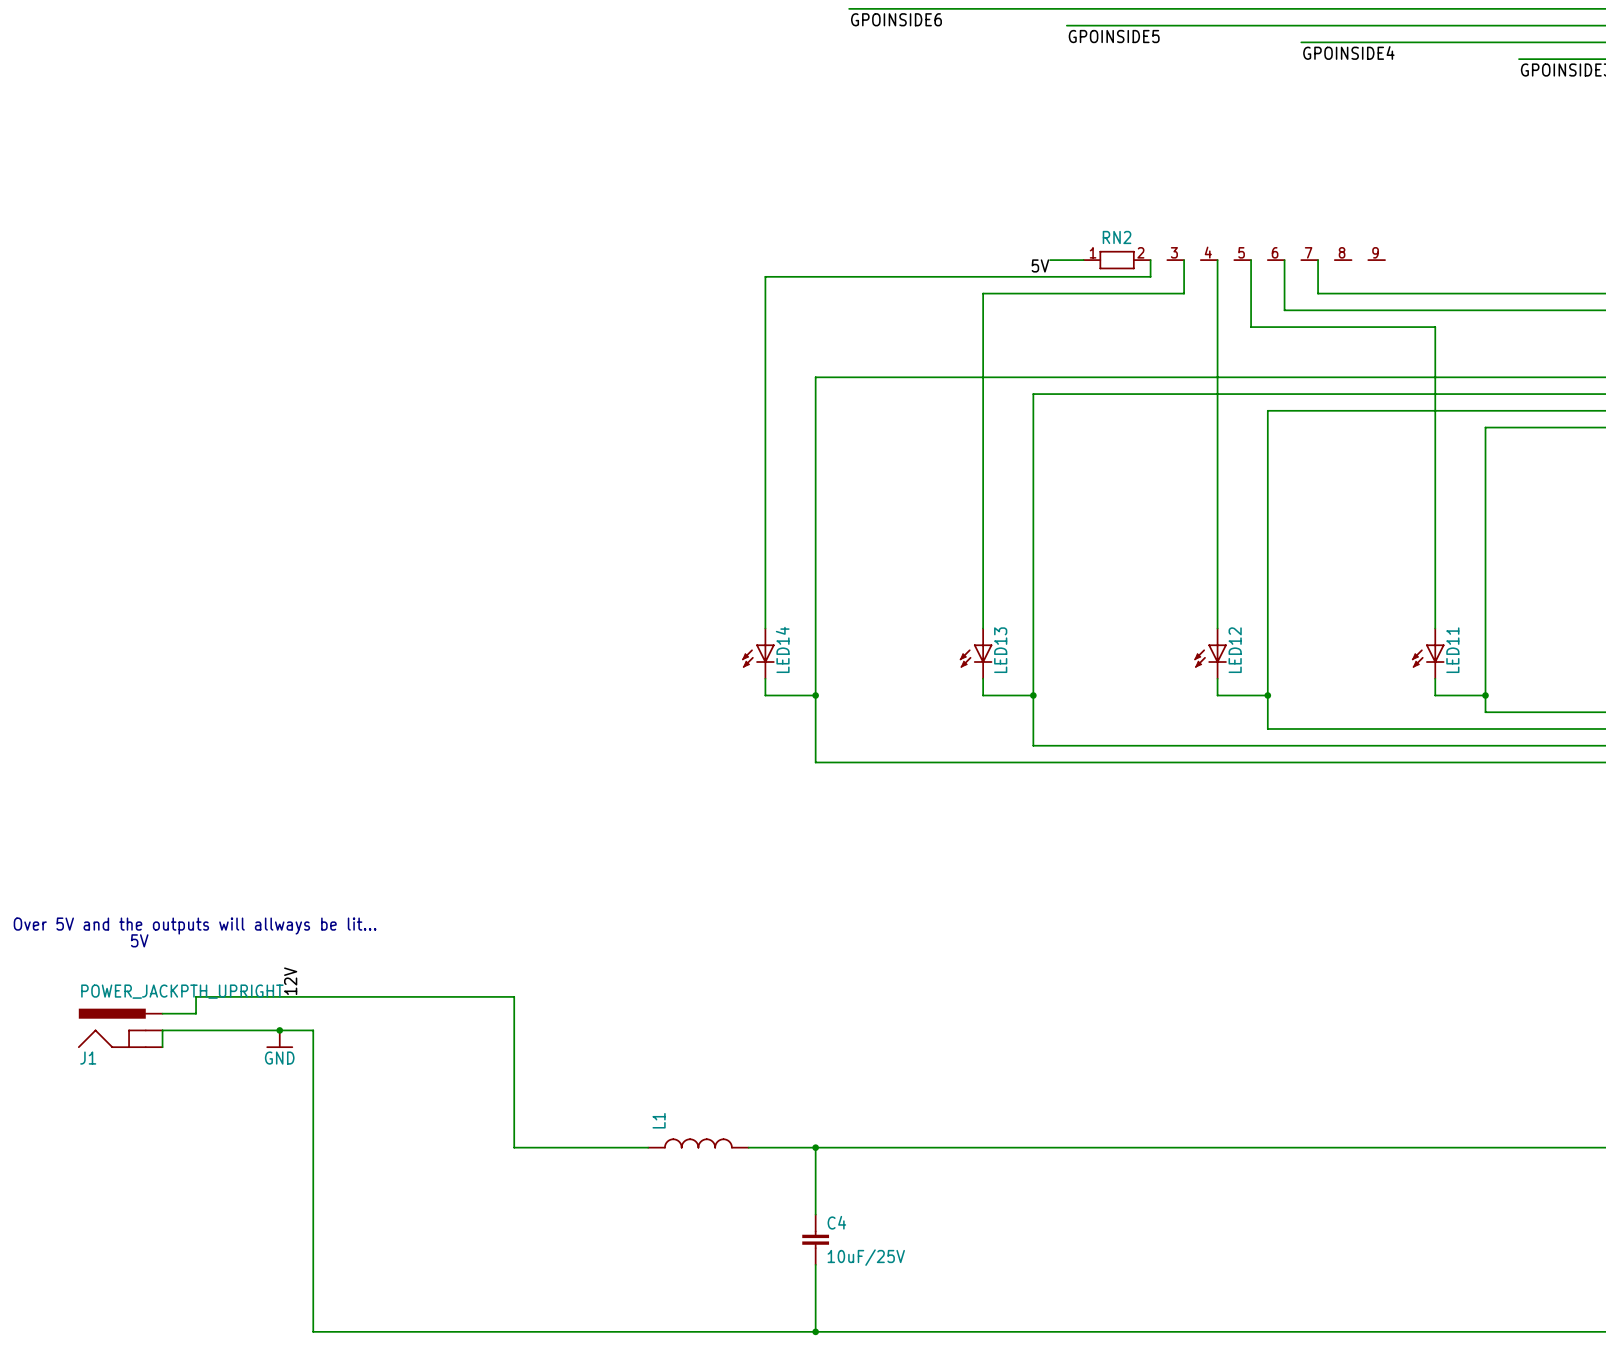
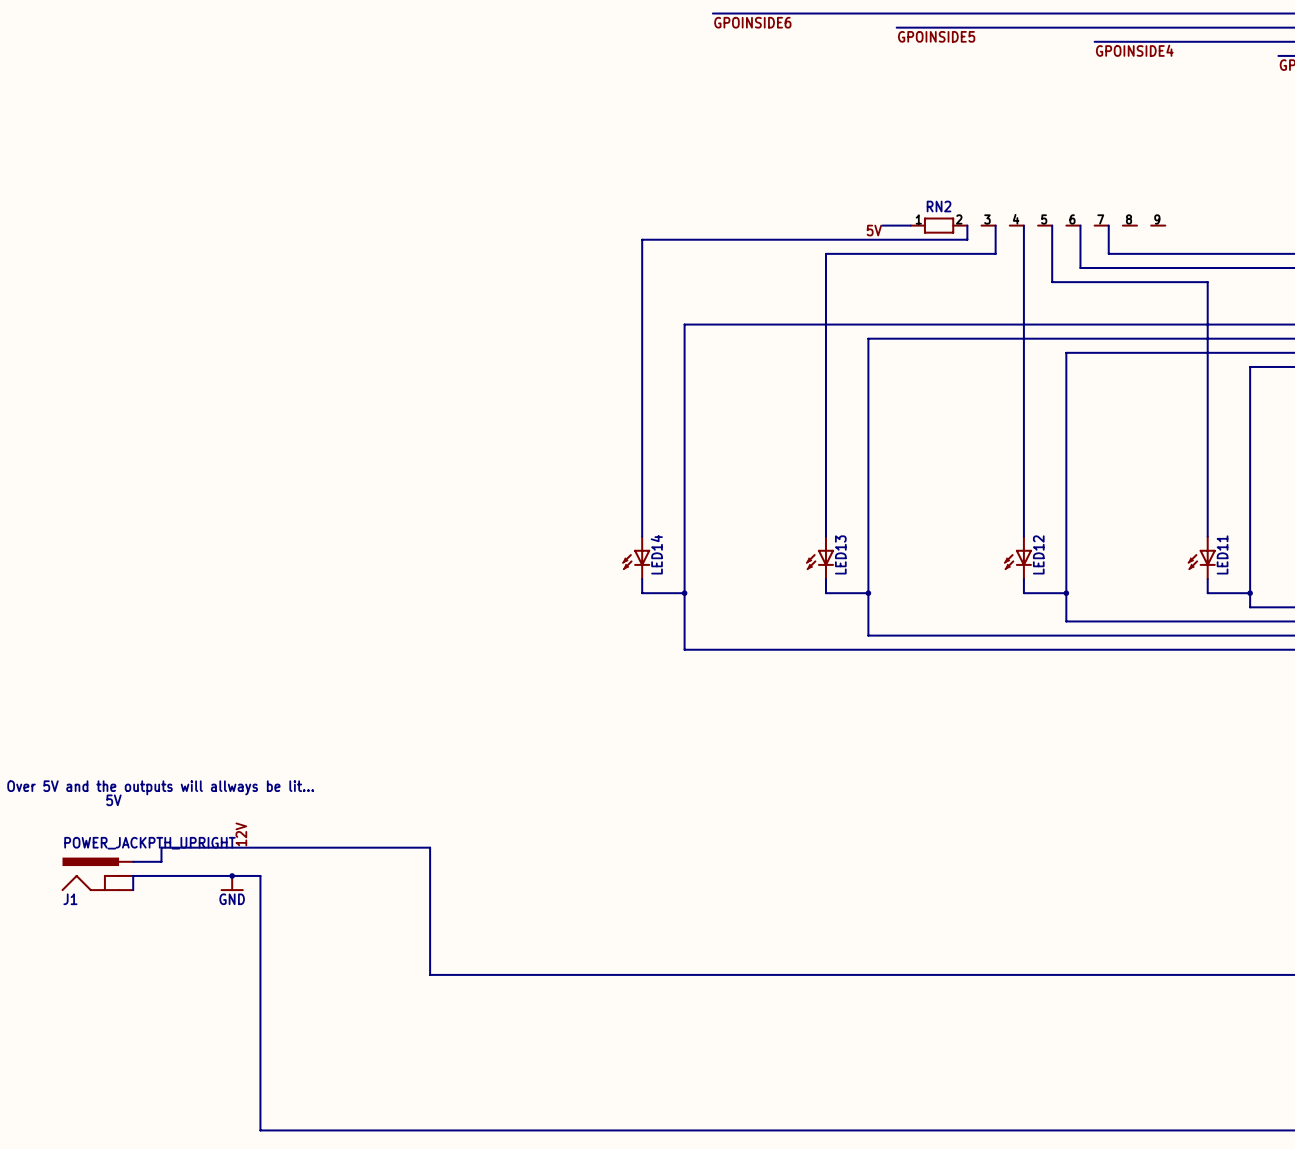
L1: (698, 1143) -> none
wire: none -> (543, 974) (628, 974)
wire: (815, 1147) (815, 1214) -> none
junction: (815, 1147) -> none
C4: 10uF/25V (815, 1239) -> none
wire: (815, 1264) (815, 1331) -> none
junction: (815, 1331) -> none

